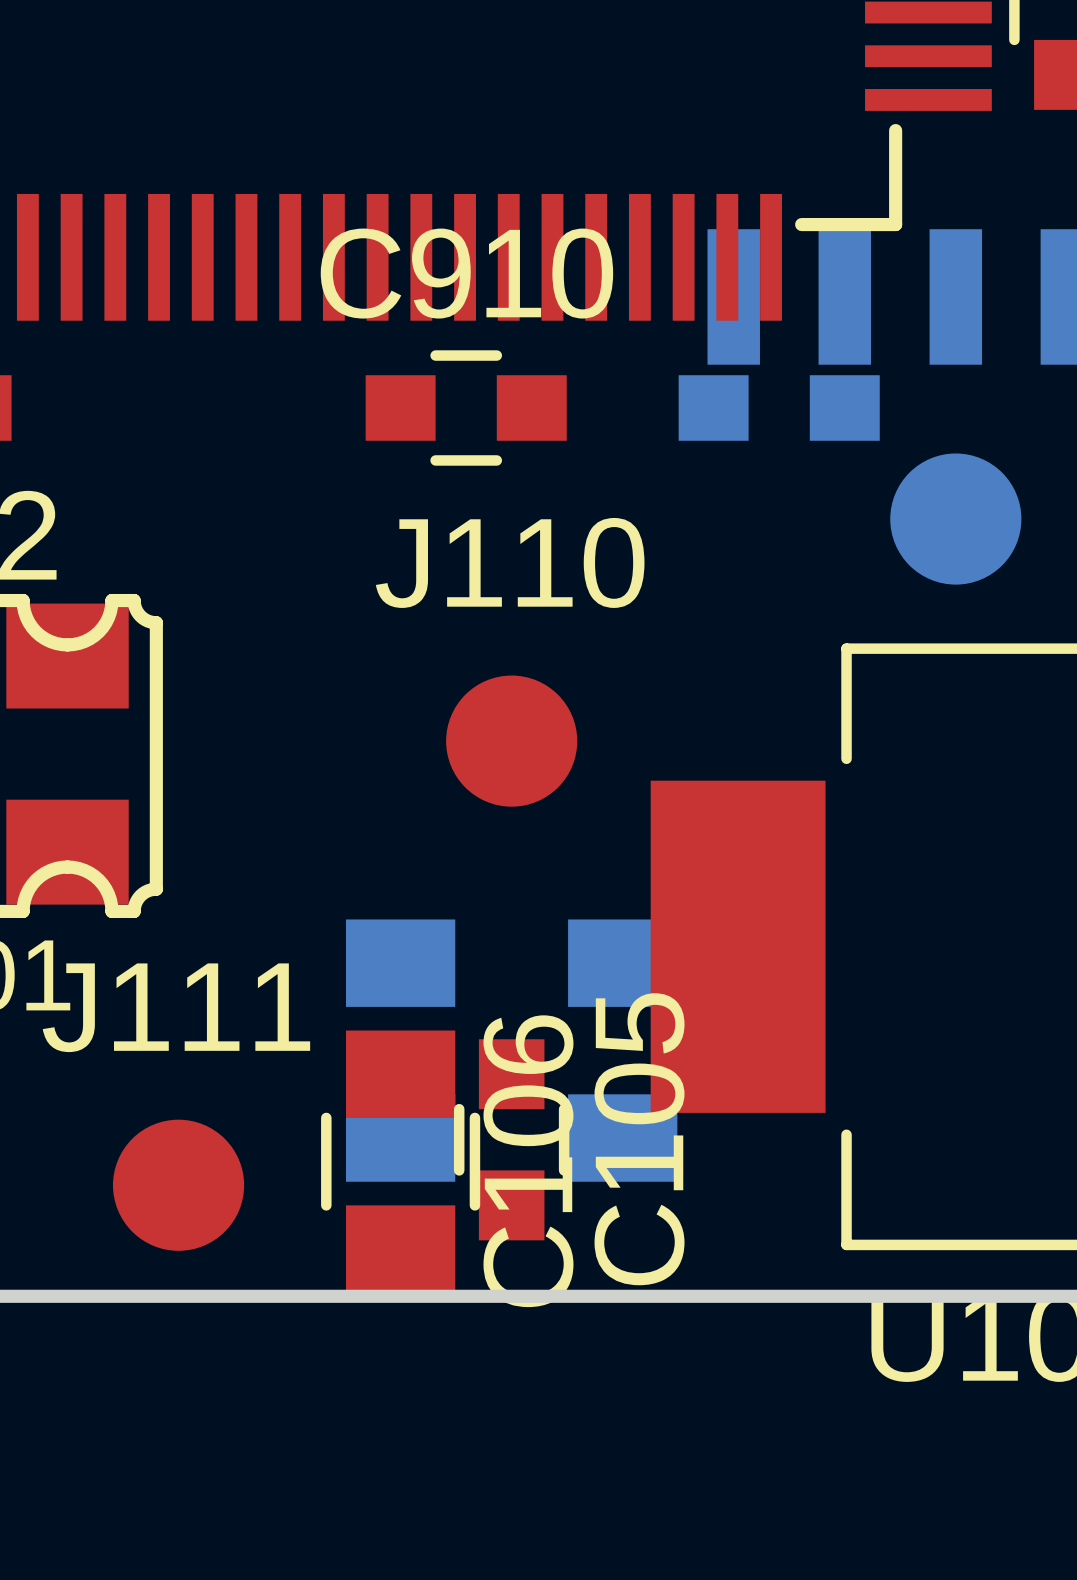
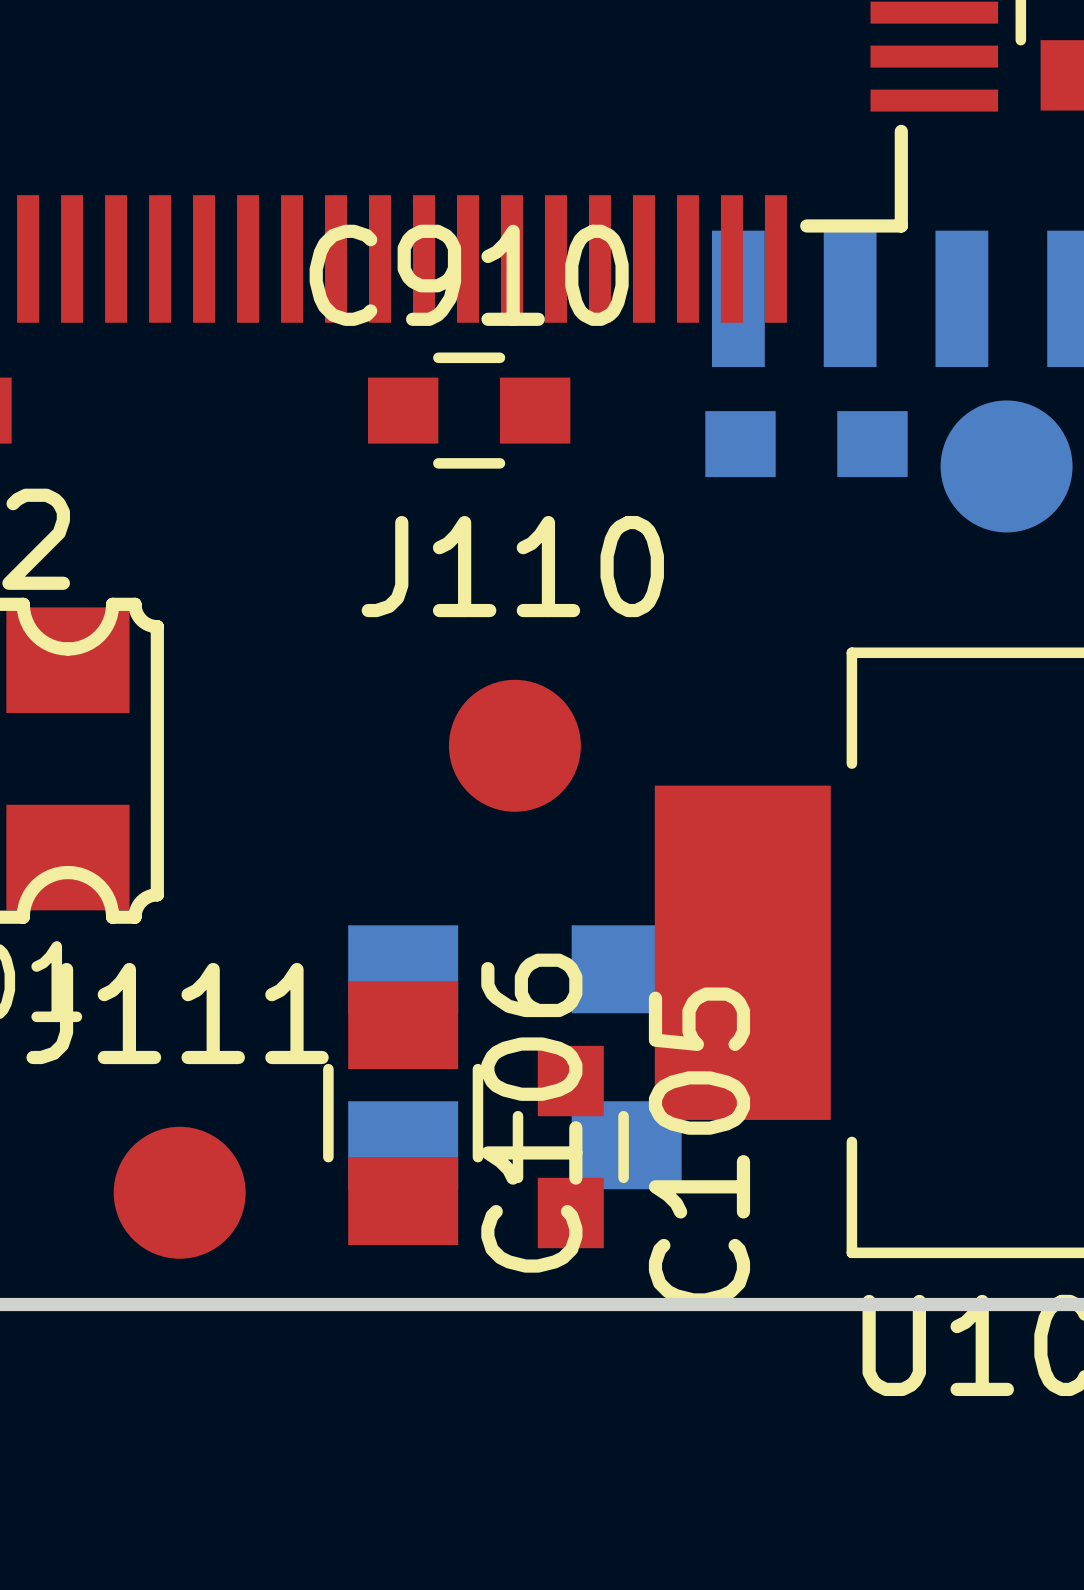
part position: (779, 408) -> (806, 444)
part position: (955, 519) -> (1006, 466)
C105 position: (511, 1139) -> (570, 1147)
C106 position: (400, 1161) -> (403, 1113)

